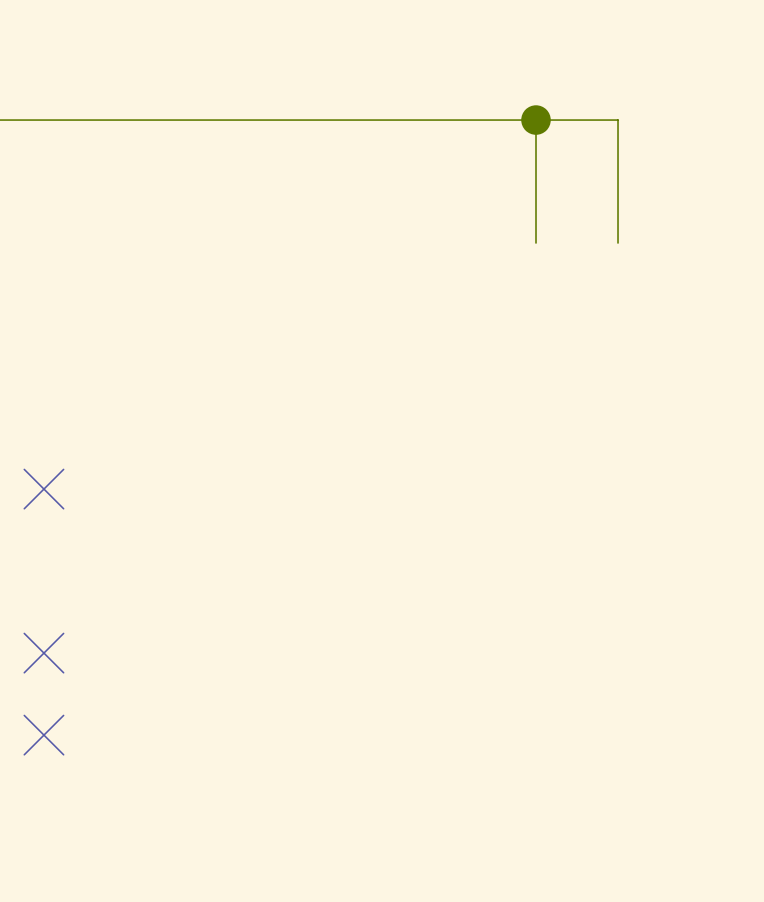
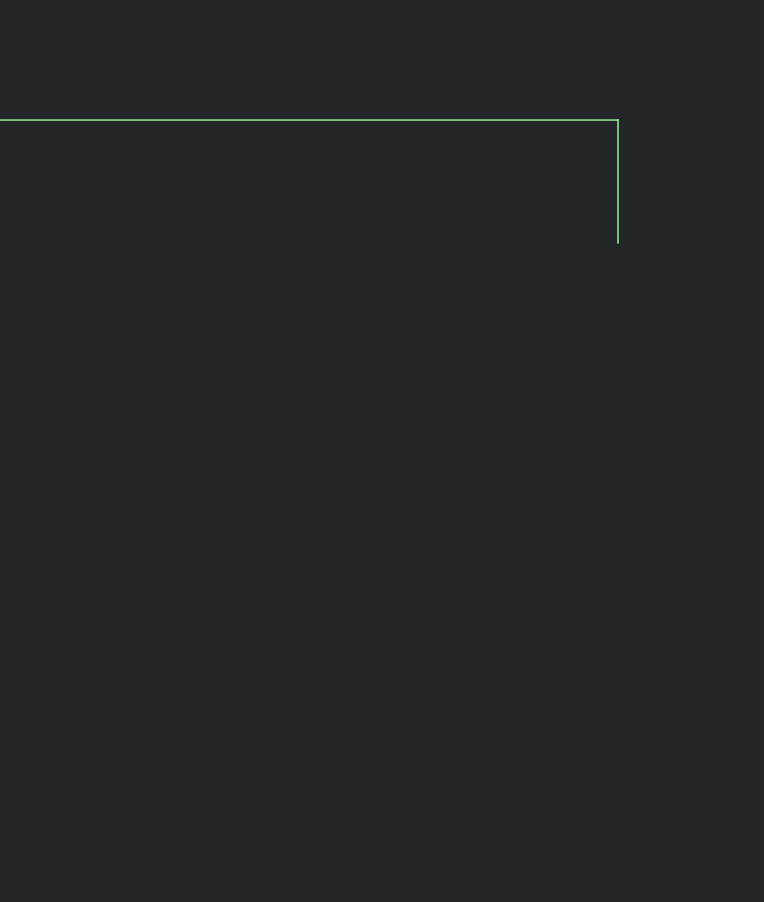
wire: (536, 120) (536, 243) -> none
junction: (536, 120) -> none
no-connect mark: (43, 489) -> none
no-connect mark: (43, 653) -> none
no-connect mark: (43, 735) -> none

